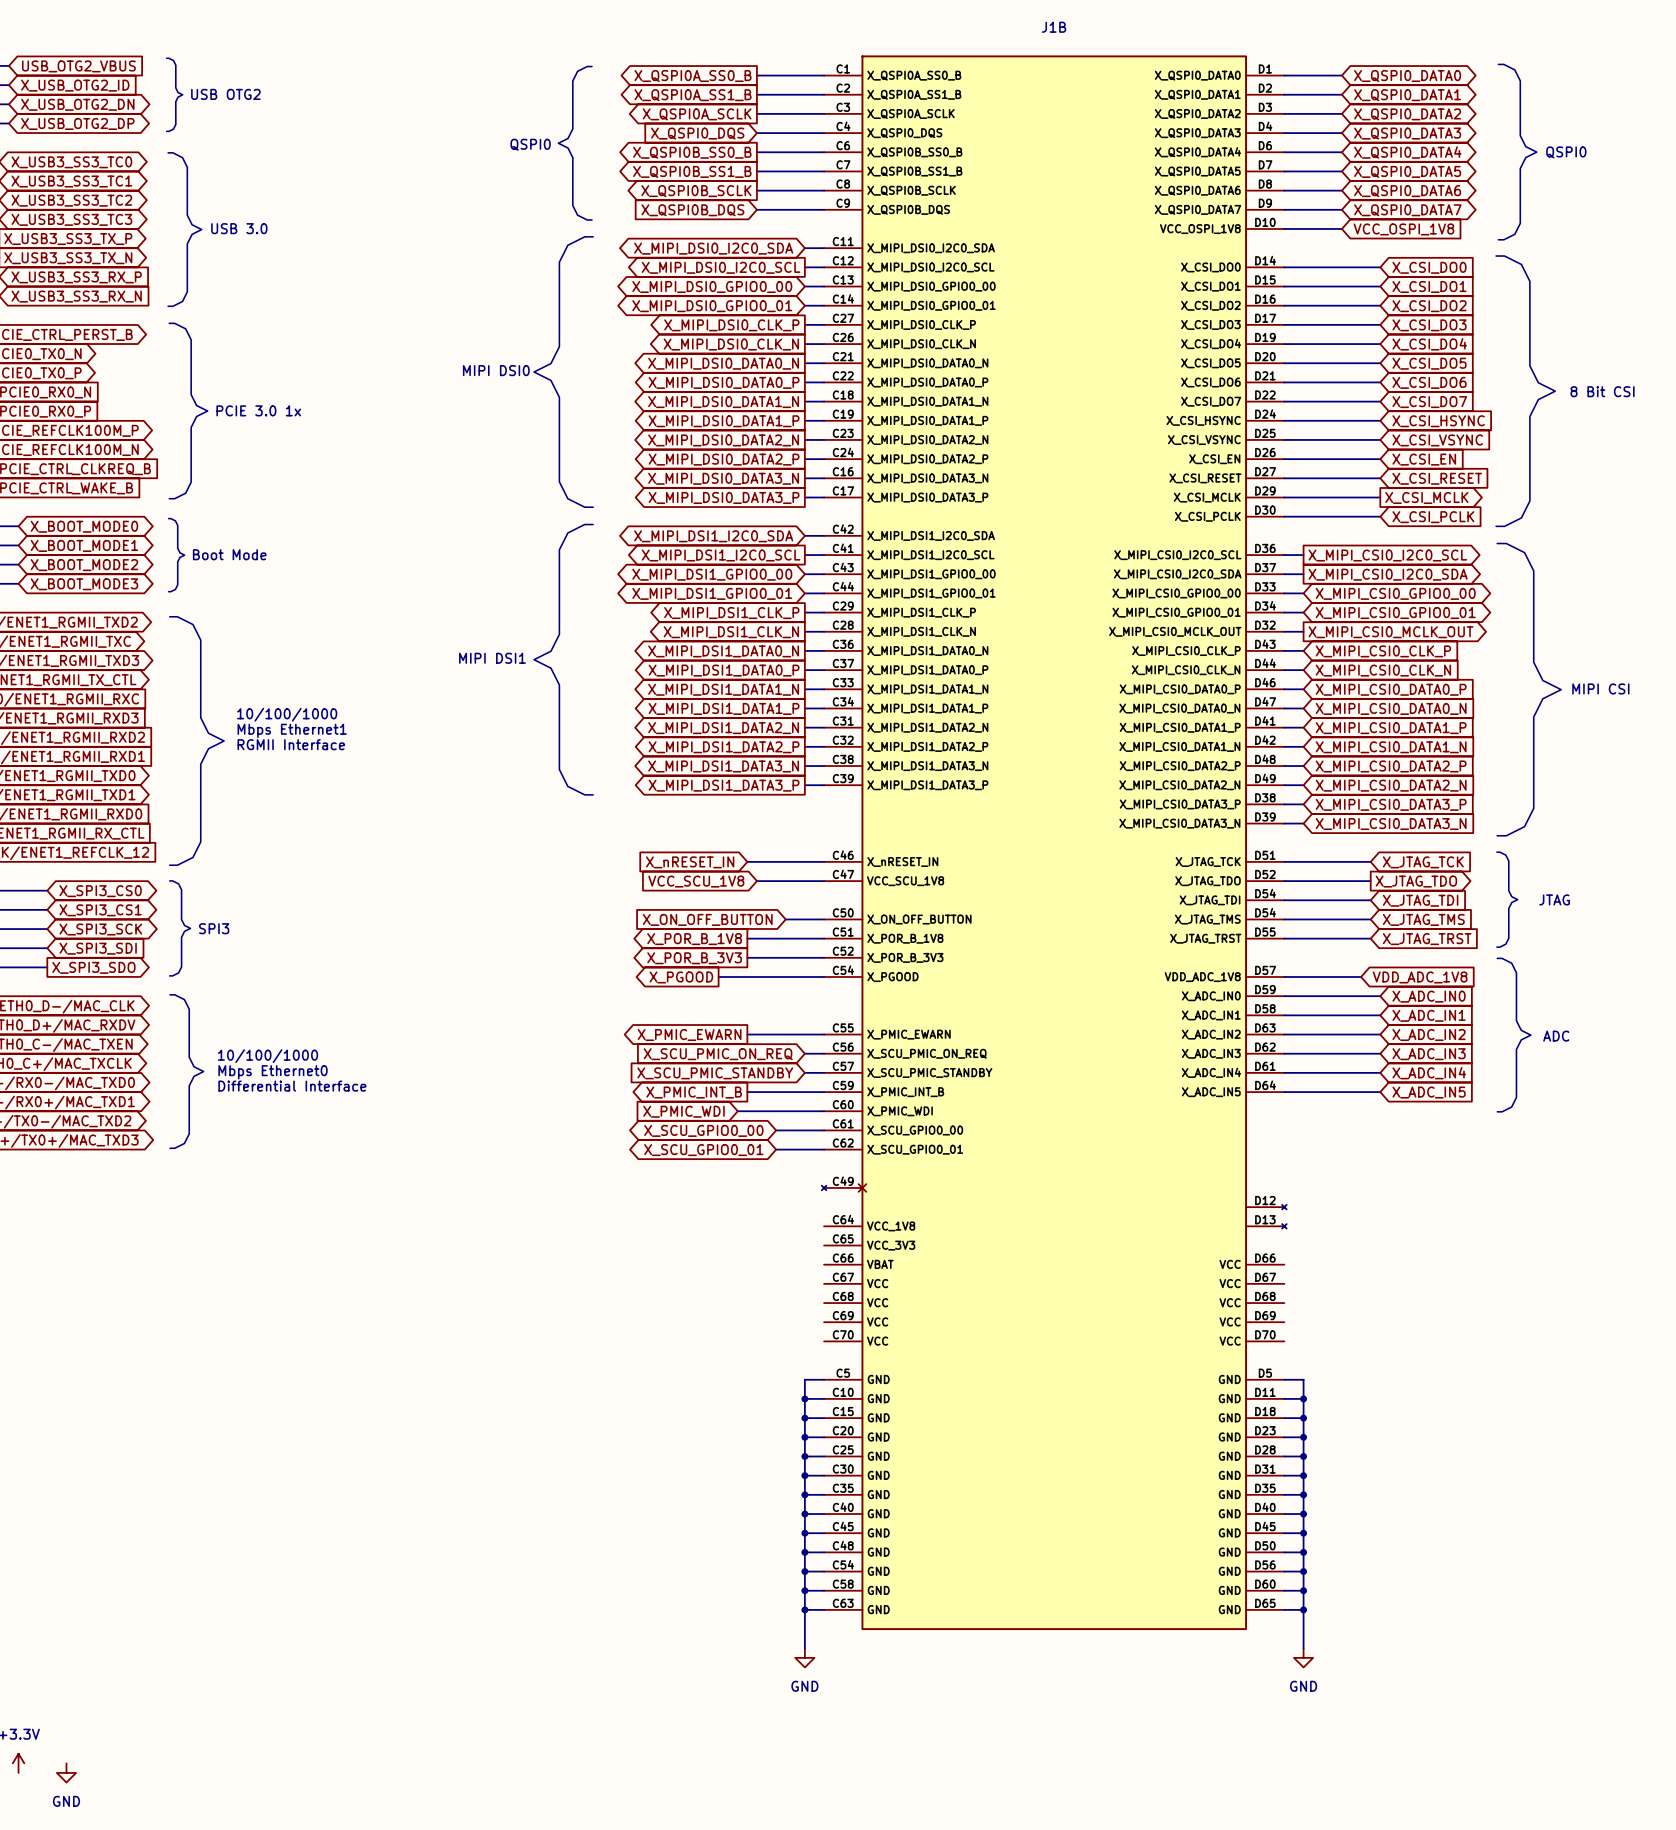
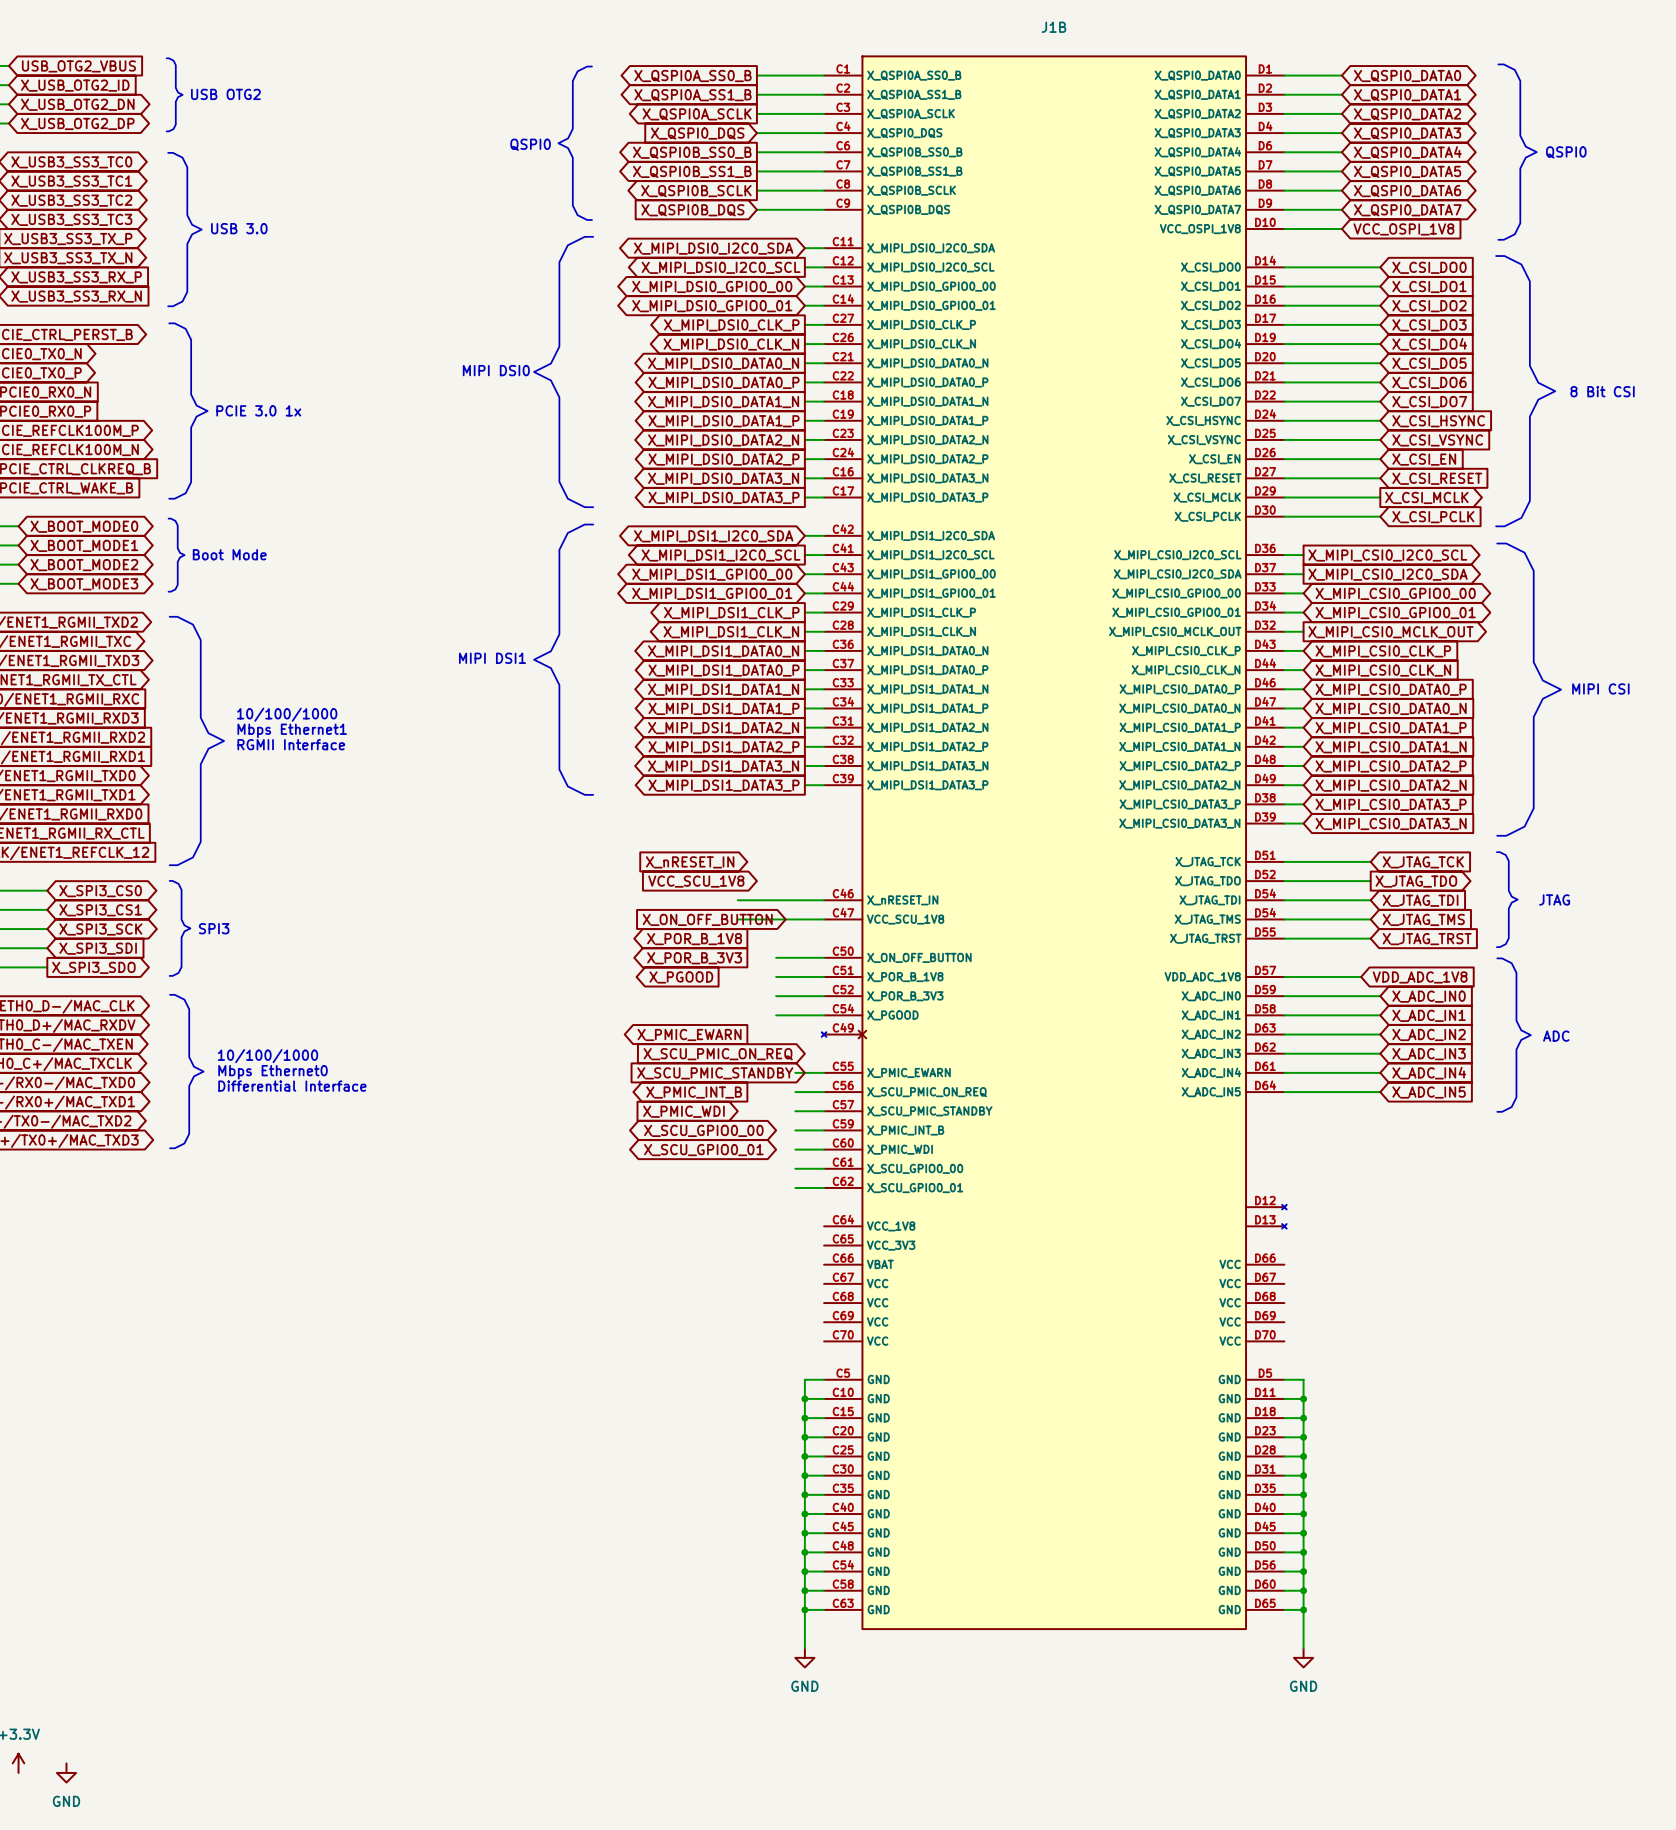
J1B symbol: [821, 55, 1287, 1631] -> [821, 55, 1287, 1631]
wire: (747, 861) (824, 861) -> none
wire: (756, 881) (824, 881) -> none
wire: none -> (737, 900) (824, 900)
wire: none -> (737, 919) (785, 919)
wire: (747, 938) (824, 938) -> none
wire: (747, 957) (776, 957) -> none
wire: (718, 976) (776, 976) -> none
wire: none -> (776, 996) (824, 996)
wire: (747, 1034) (824, 1034) -> none
wire: (804, 1053) (824, 1053) -> none
wire: none -> (795, 1072) (804, 1072)
wire: (747, 1092) (795, 1092) -> (776, 1015) (824, 1015)
wire: (737, 1111) (795, 1111) -> none
wire: (776, 1130) (795, 1130) -> none
wire: (776, 1149) (795, 1149) -> none
wire: none -> (795, 1168) (824, 1168)
wire: none -> (795, 1187) (824, 1187)

